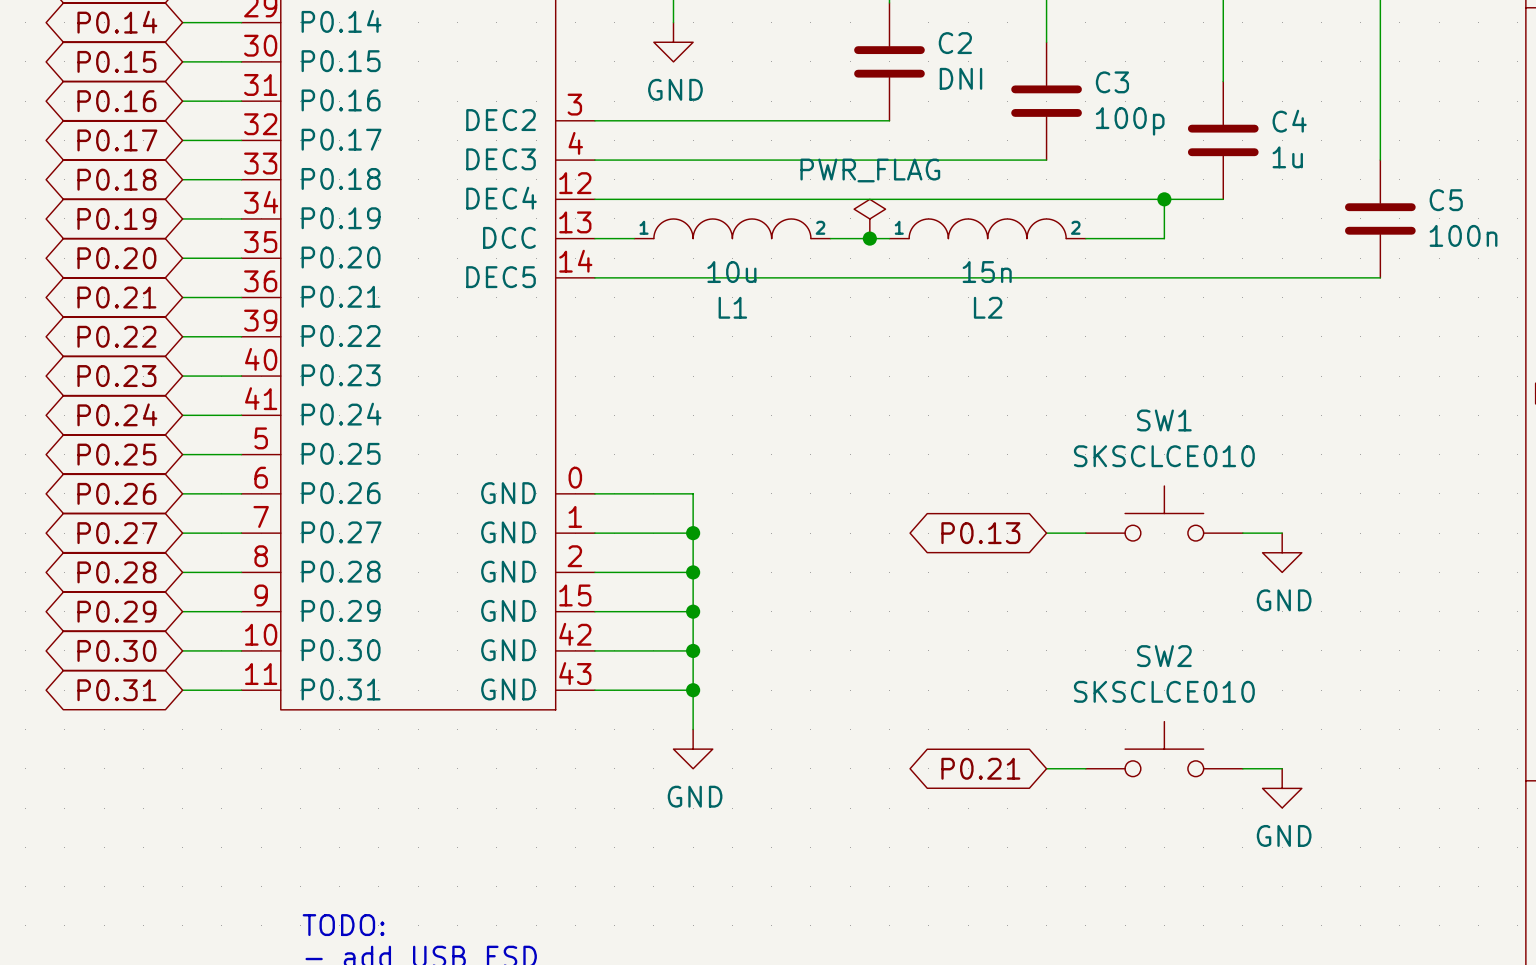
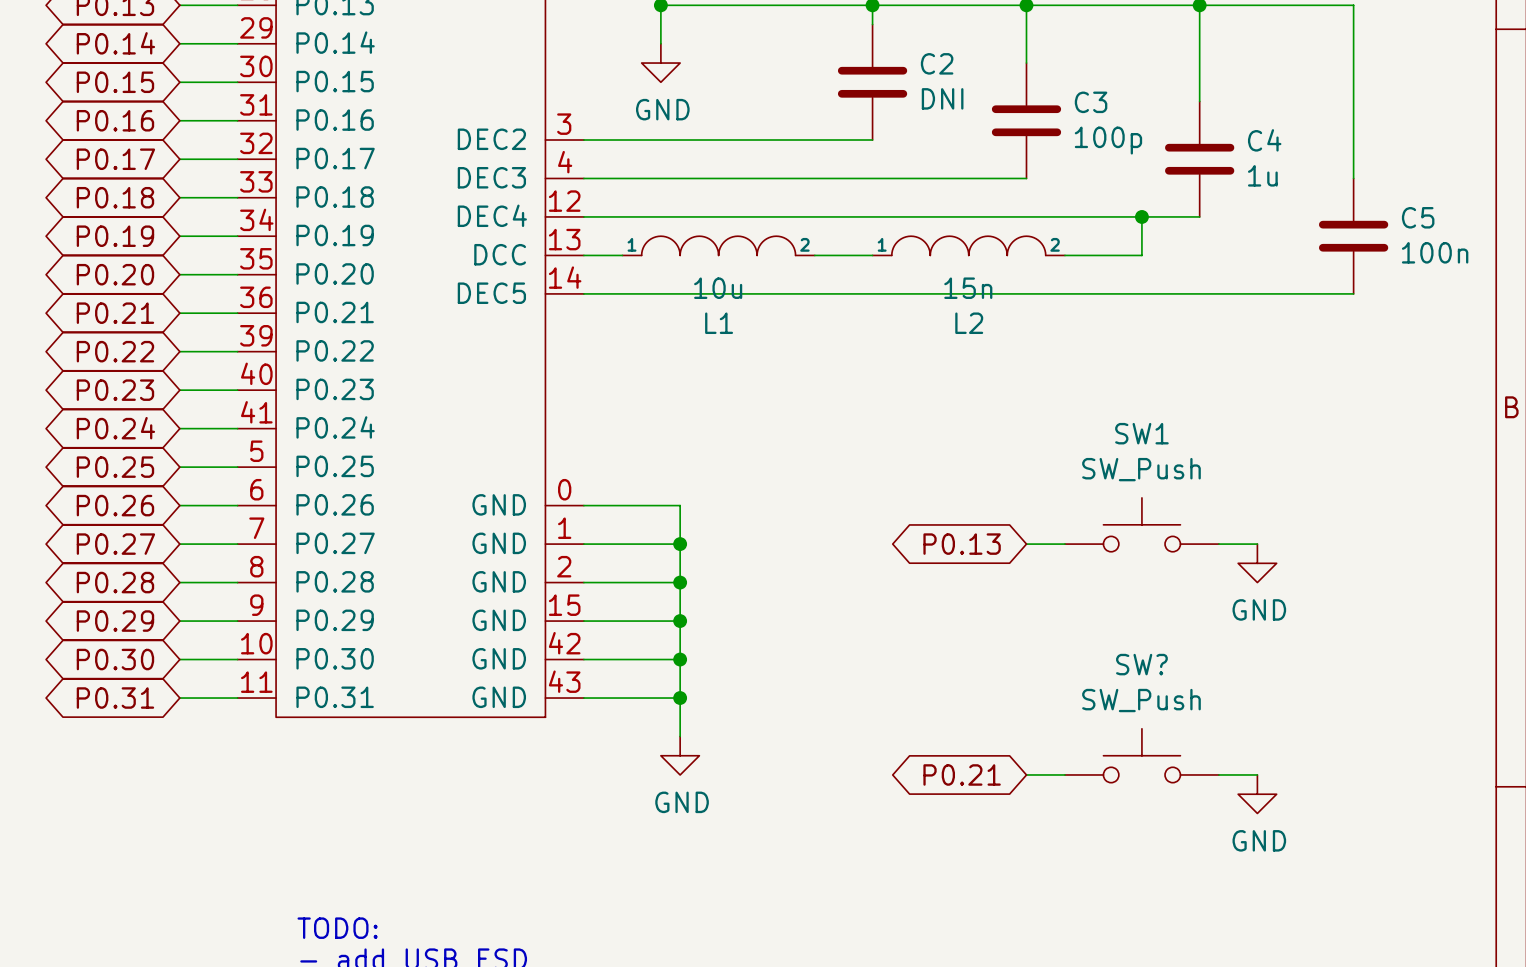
power symbol: PWR_FLAG (869, 218) -> none
junction: (869, 238) -> none
SW1 value: SKSCLCE010 (1164, 456) -> SW_Push (1141, 469)
SW2 name: SW2 (1164, 656) -> SW? (1141, 664)
SW2 value: SKSCLCE010 (1164, 691) -> SW_Push (1141, 700)

